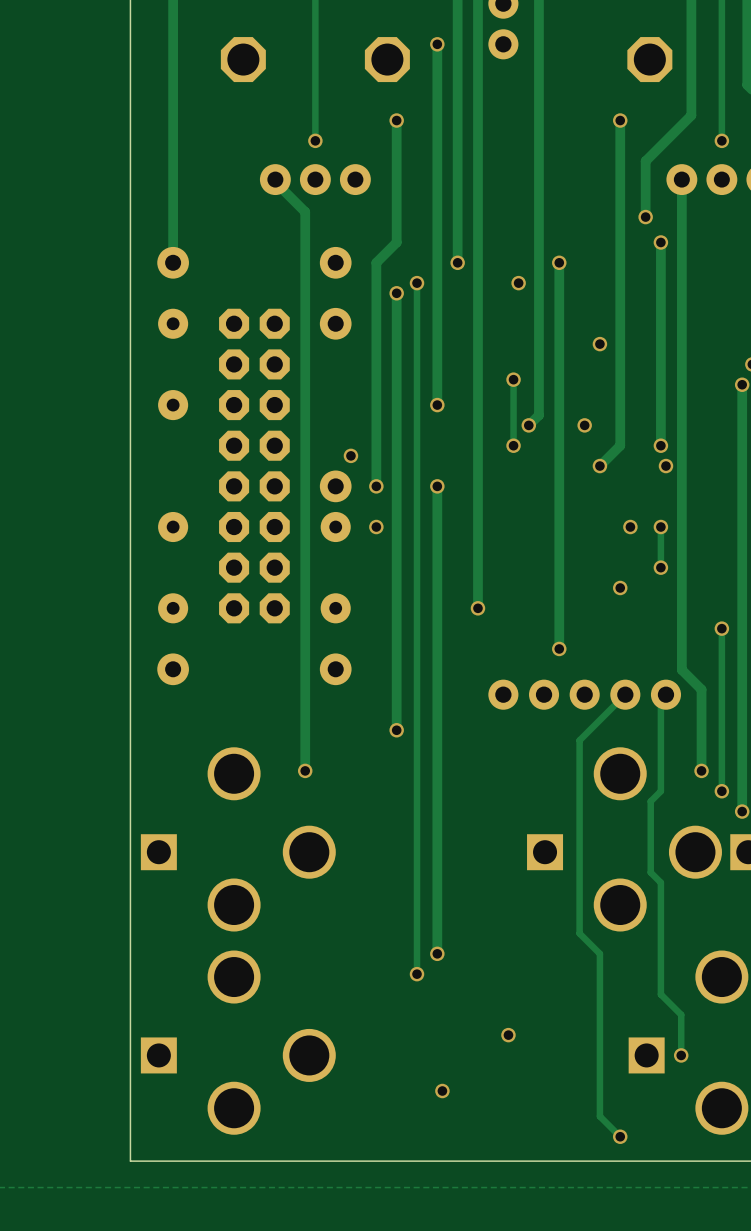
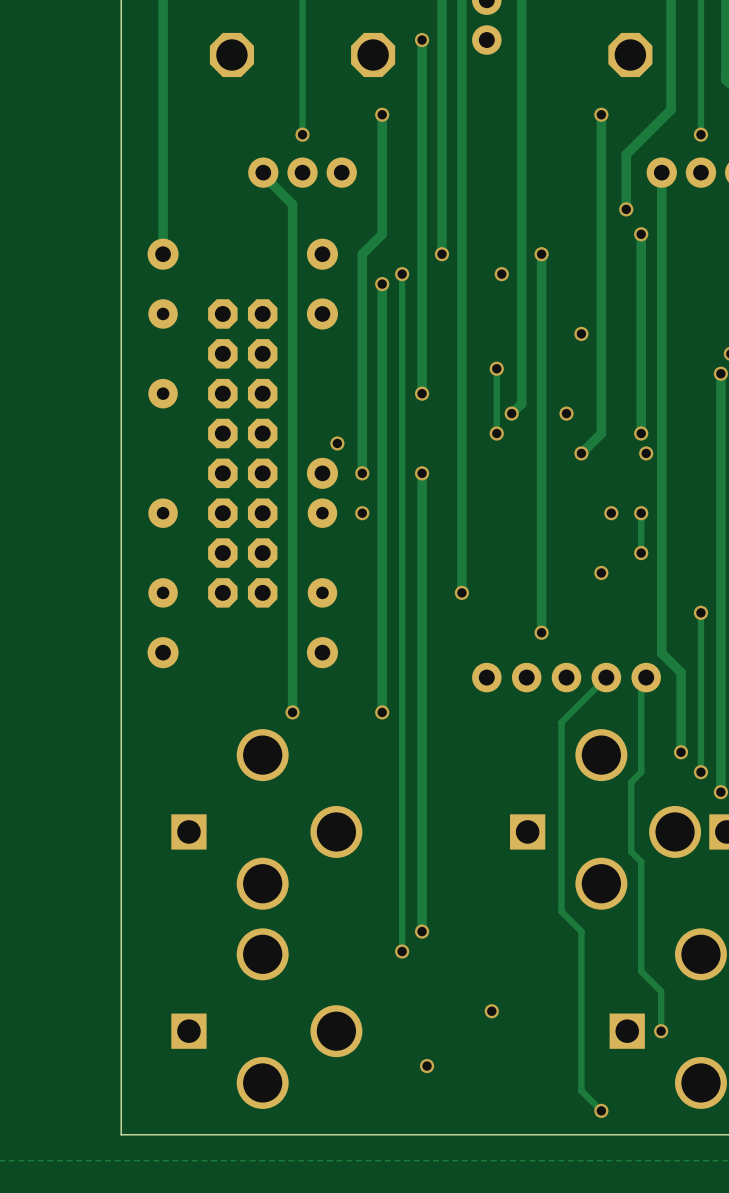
track: (305, 730) (305, 770) -> none
via position: (305, 770) -> (292, 712)
part position: (238, 839) -> (266, 819)
part position: (238, 1042) -> (266, 1018)

